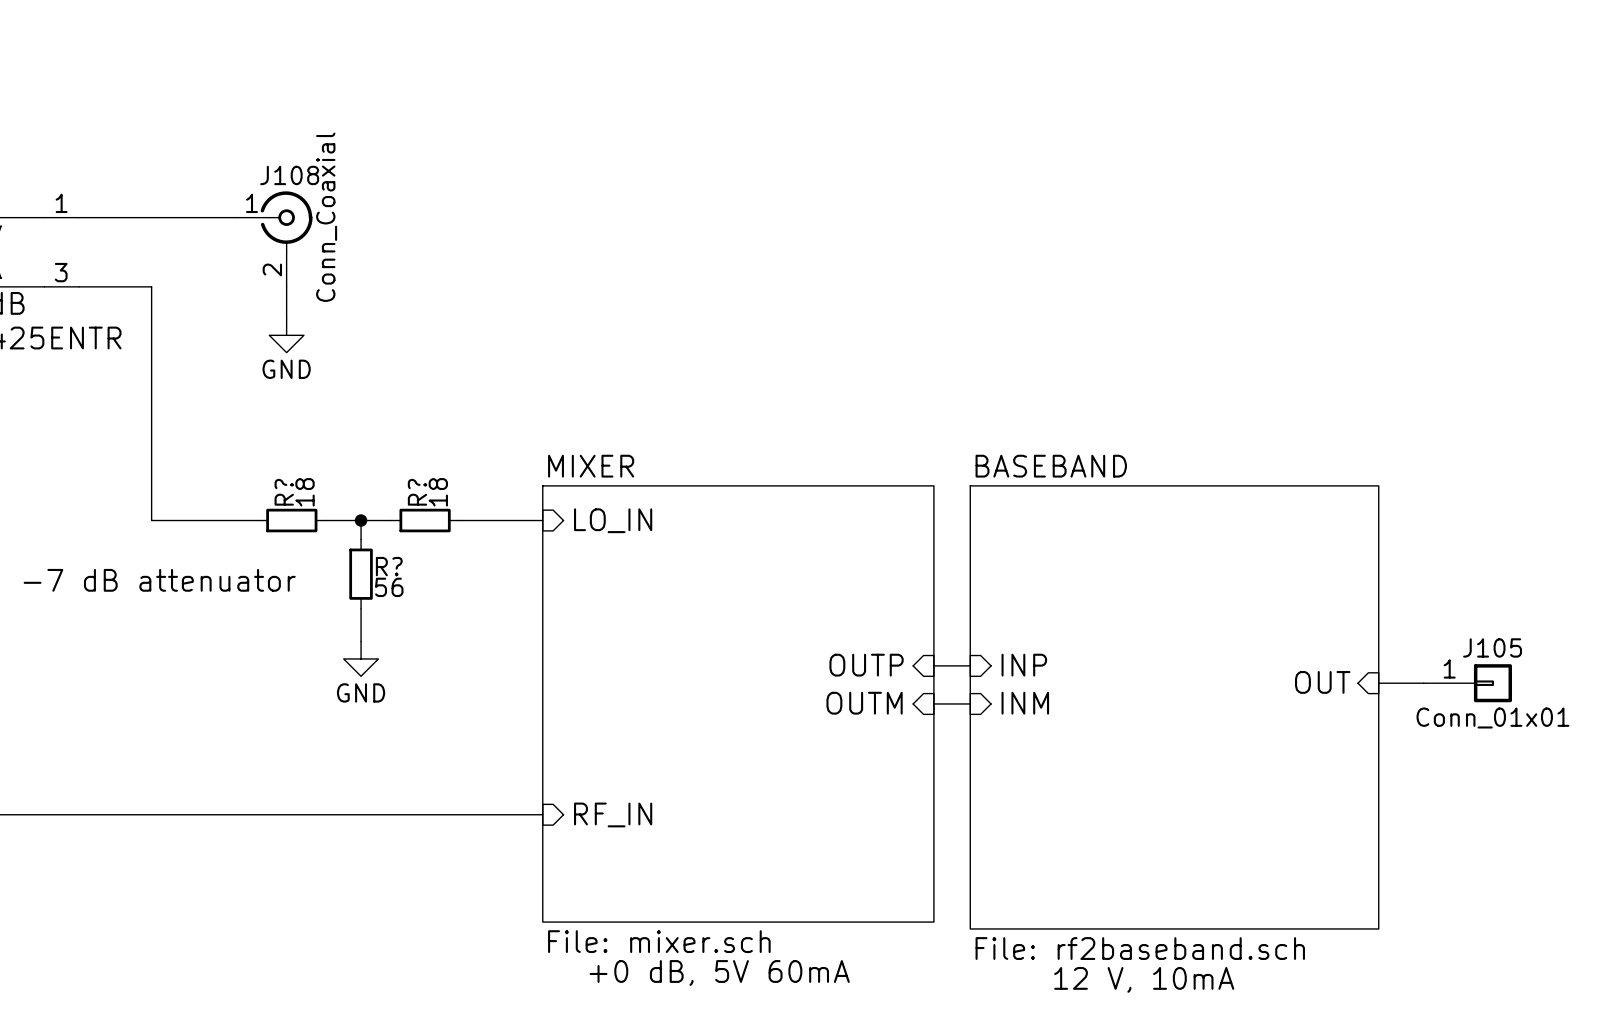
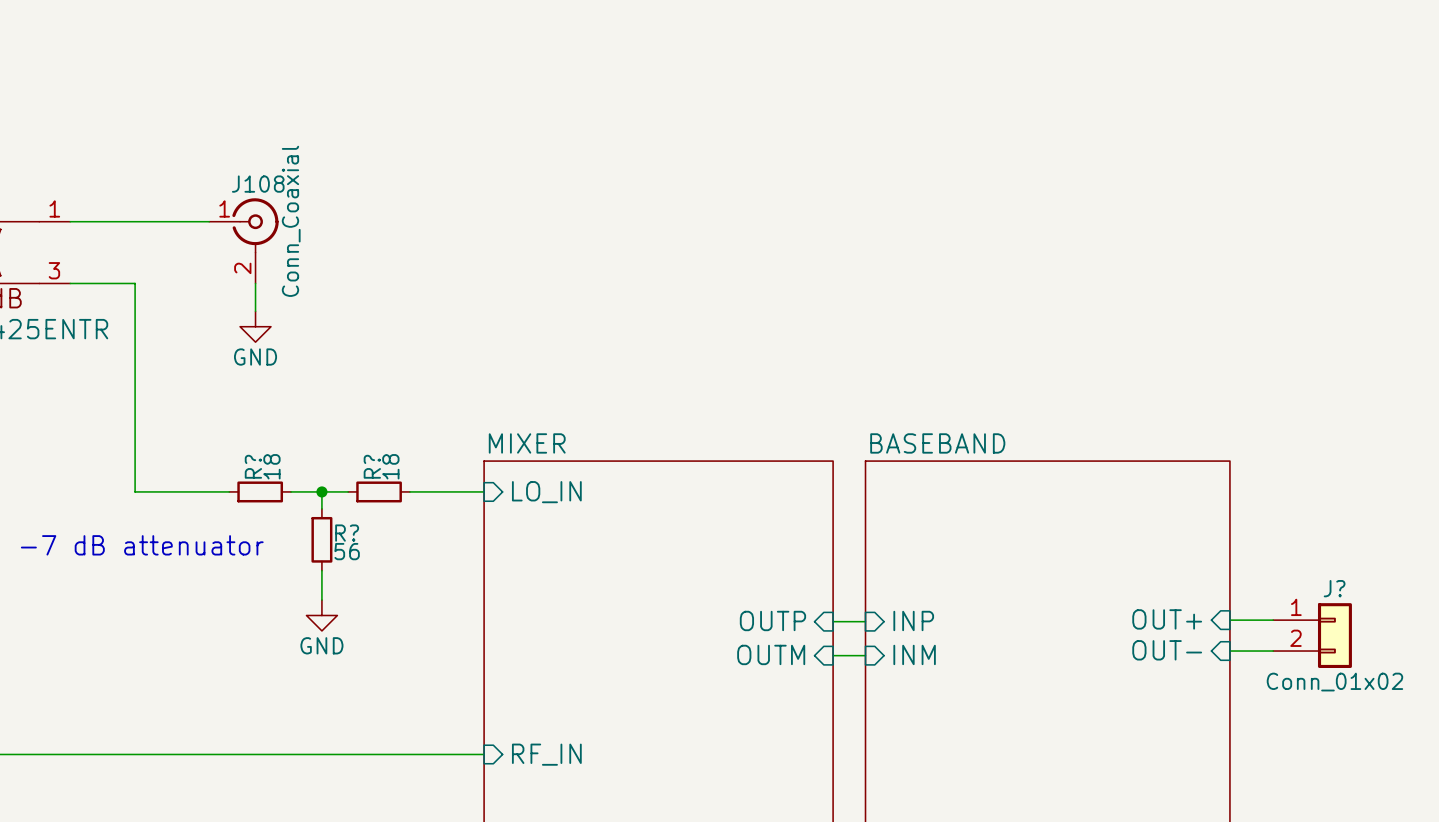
sheet pin: none -> OUT+ (1167, 619)
wire: none -> (1229, 620) (1273, 620)
J?: none -> Conn_01x02 (1312, 635)
sheet pin: OUT (1322, 682) -> none
wire: (1378, 683) (1423, 683) -> none
J105: Conn_01x01 (1467, 683) -> none
sheet pin: none -> OUT- (1167, 650)
wire: none -> (1229, 651) (1273, 651)

